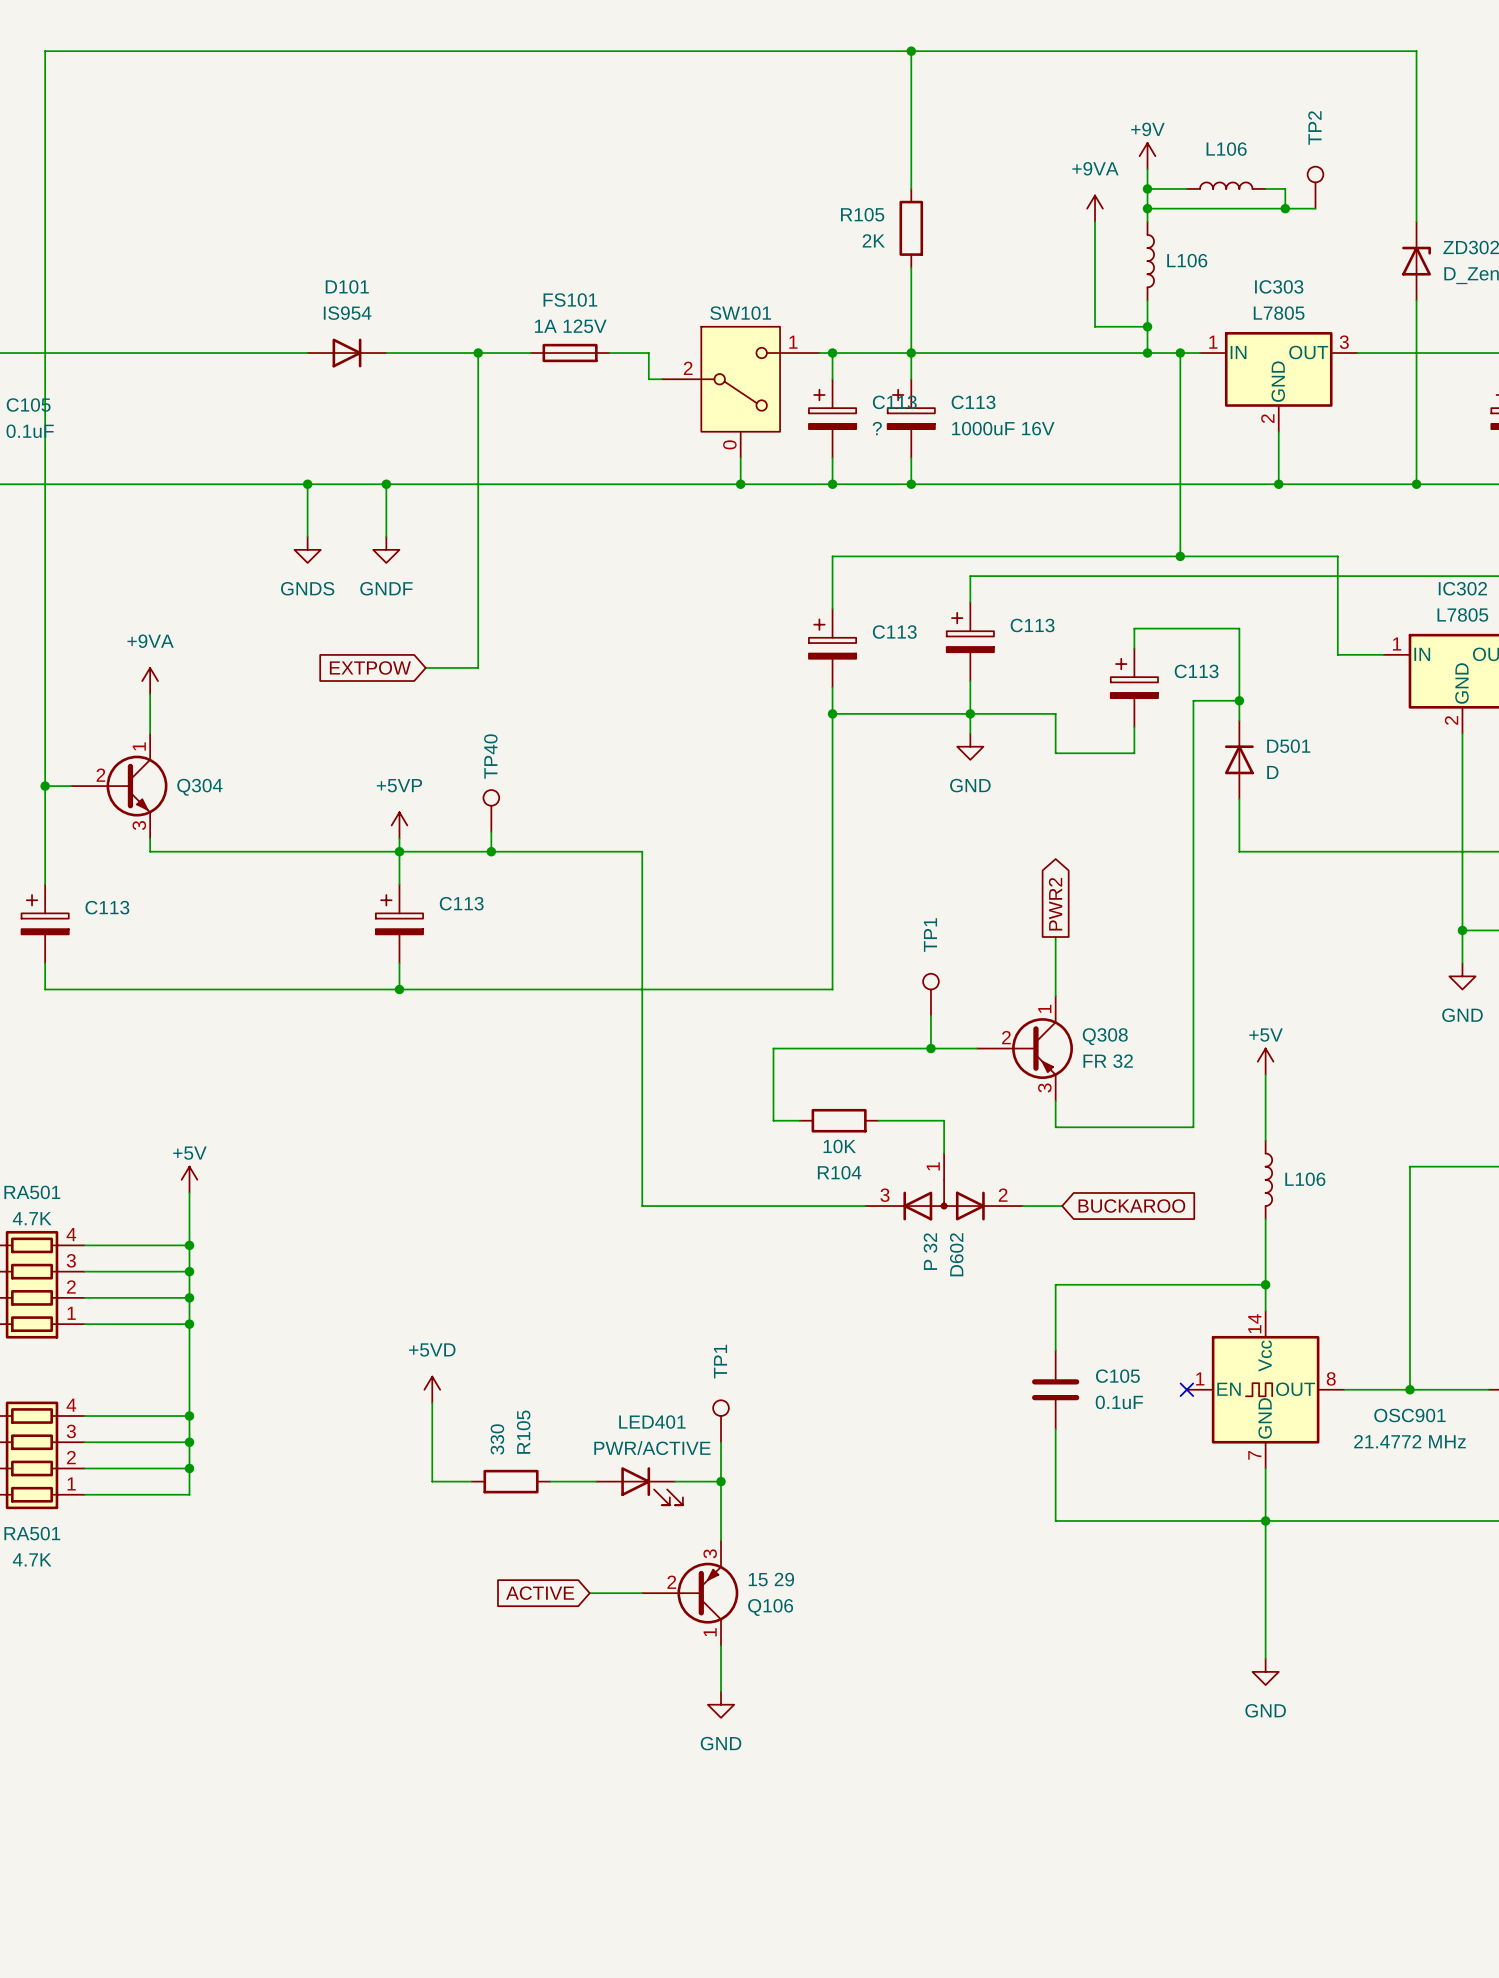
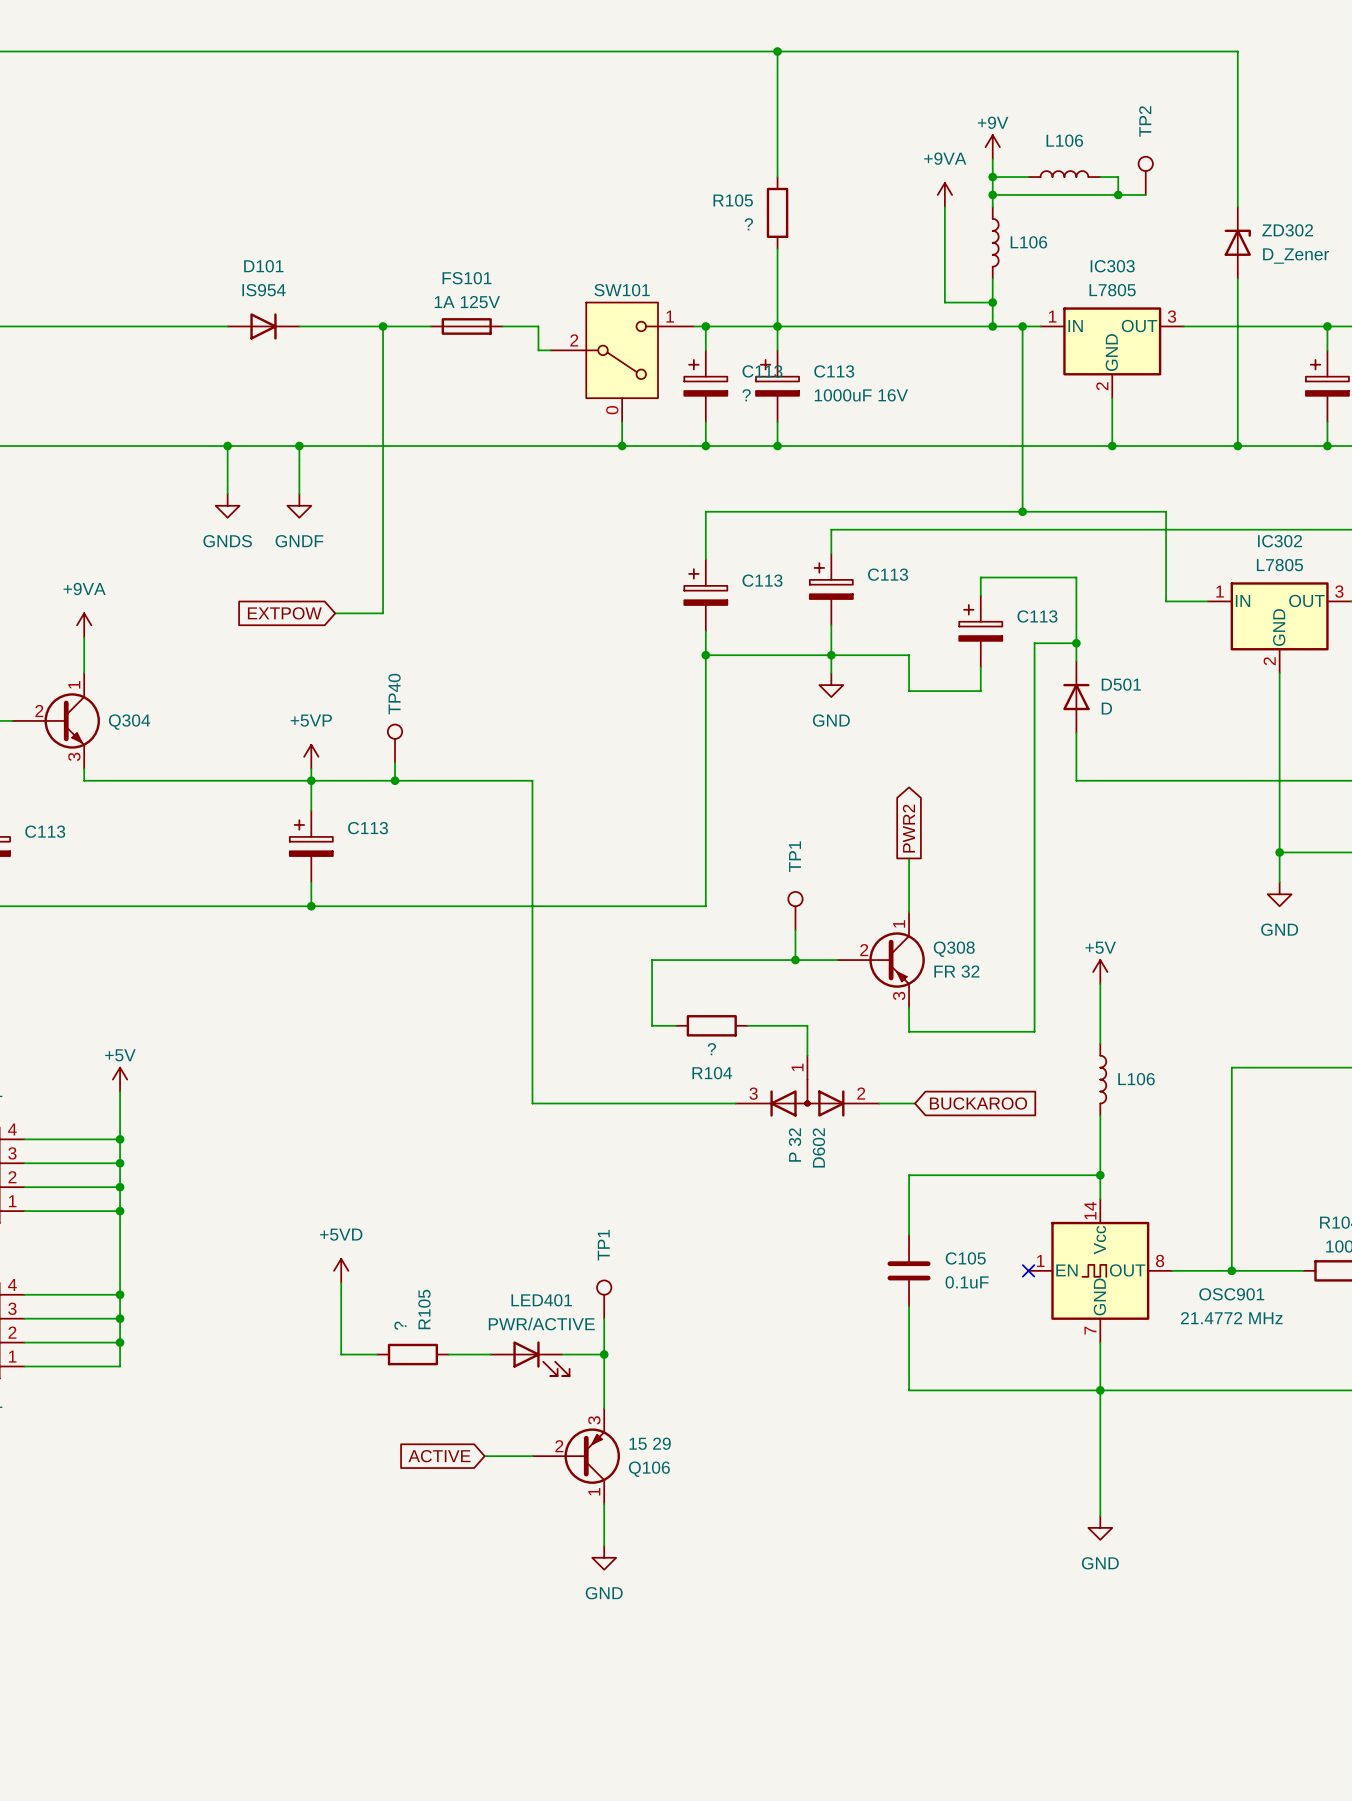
R105 value: 2K (873, 240) -> ? (748, 224)
R104 value: 10K (839, 1146) -> ? (711, 1049)
R105 value: 330 (497, 1439) -> ? (400, 1325)

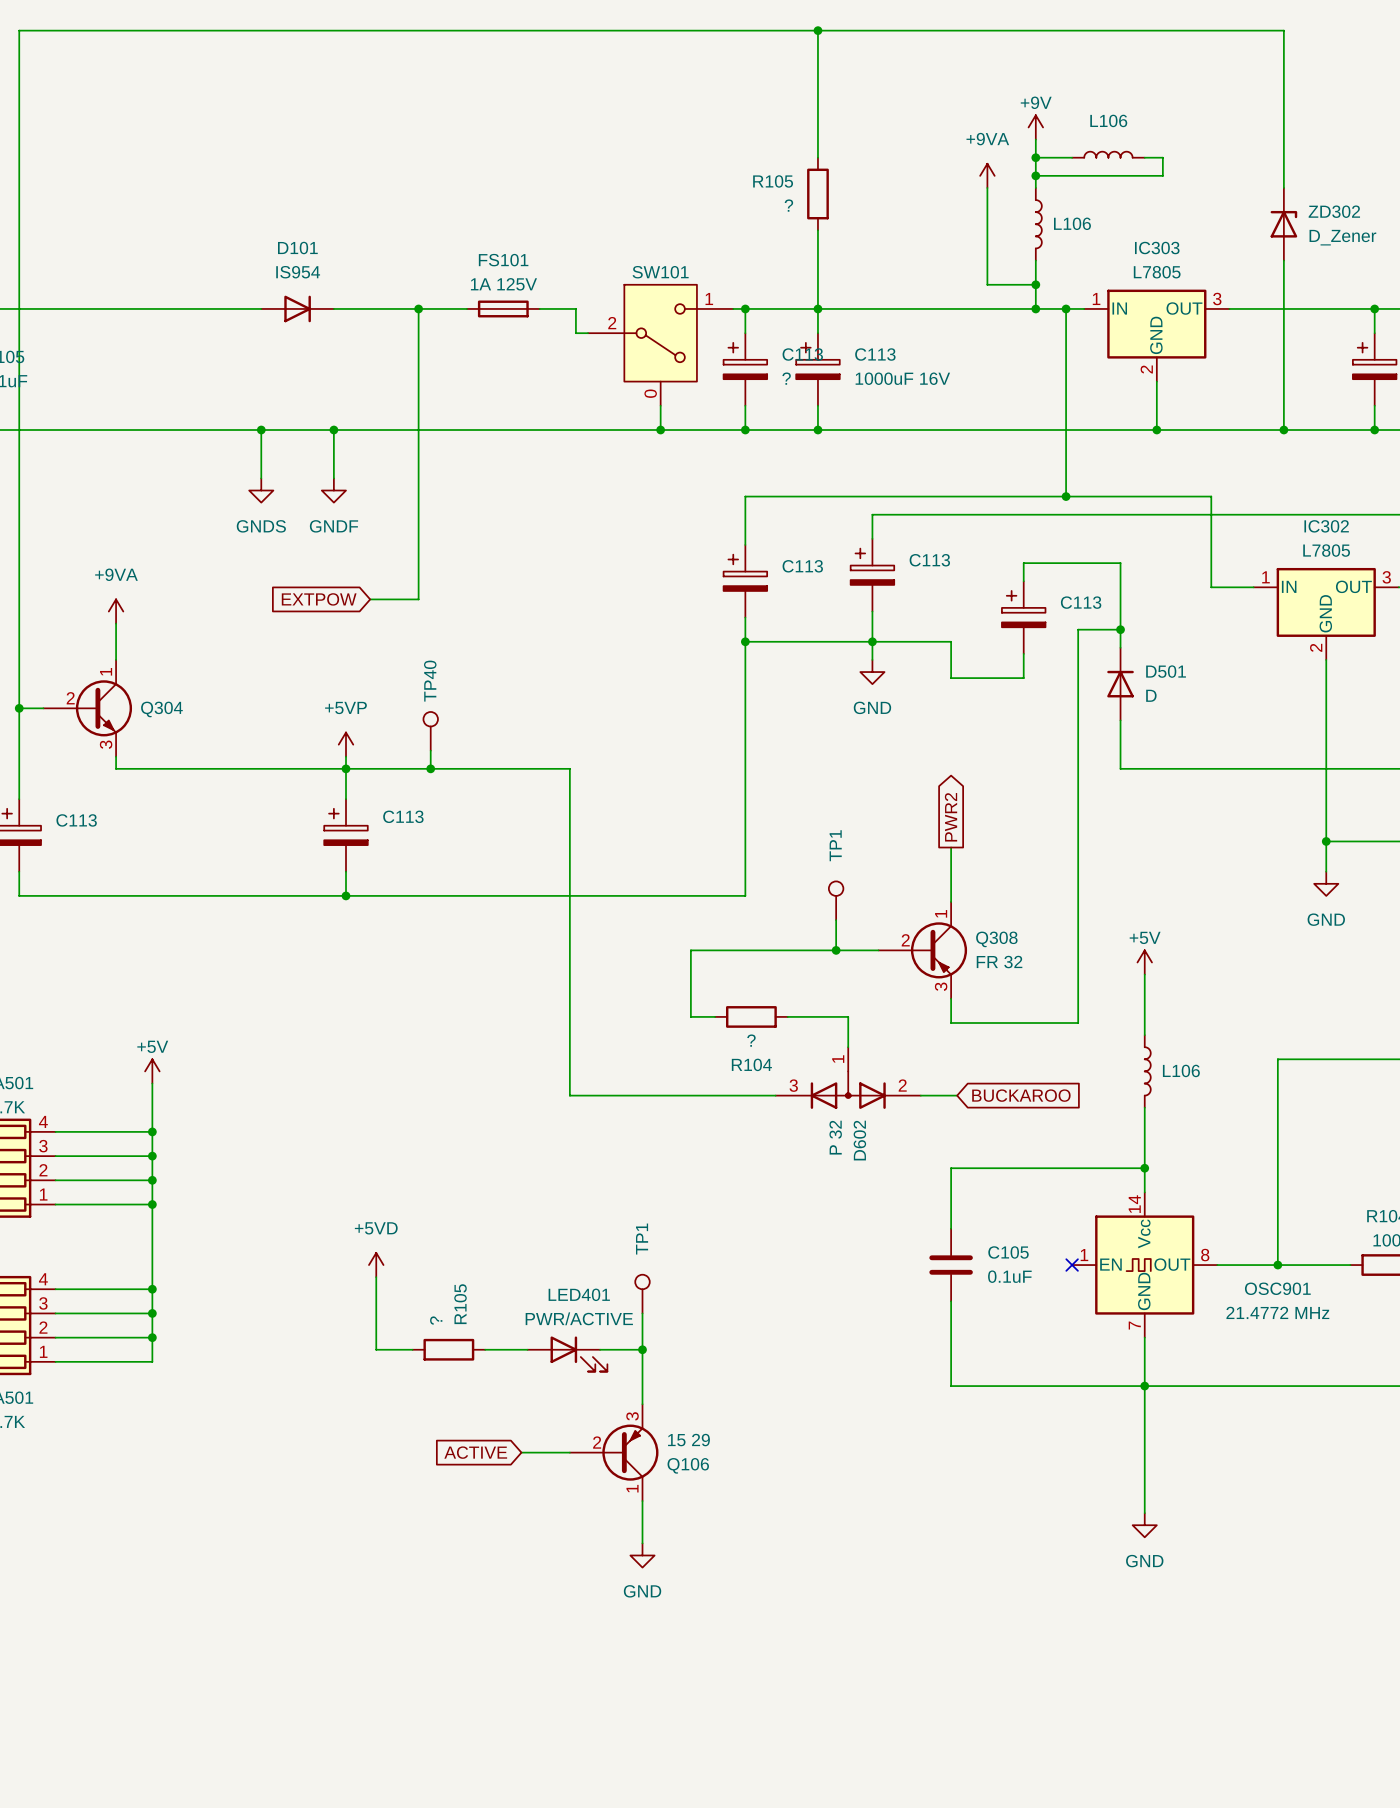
TP2: (1145, 175) -> none
wire: (1118, 194) (1145, 194) -> none
junction: (1118, 194) -> none

